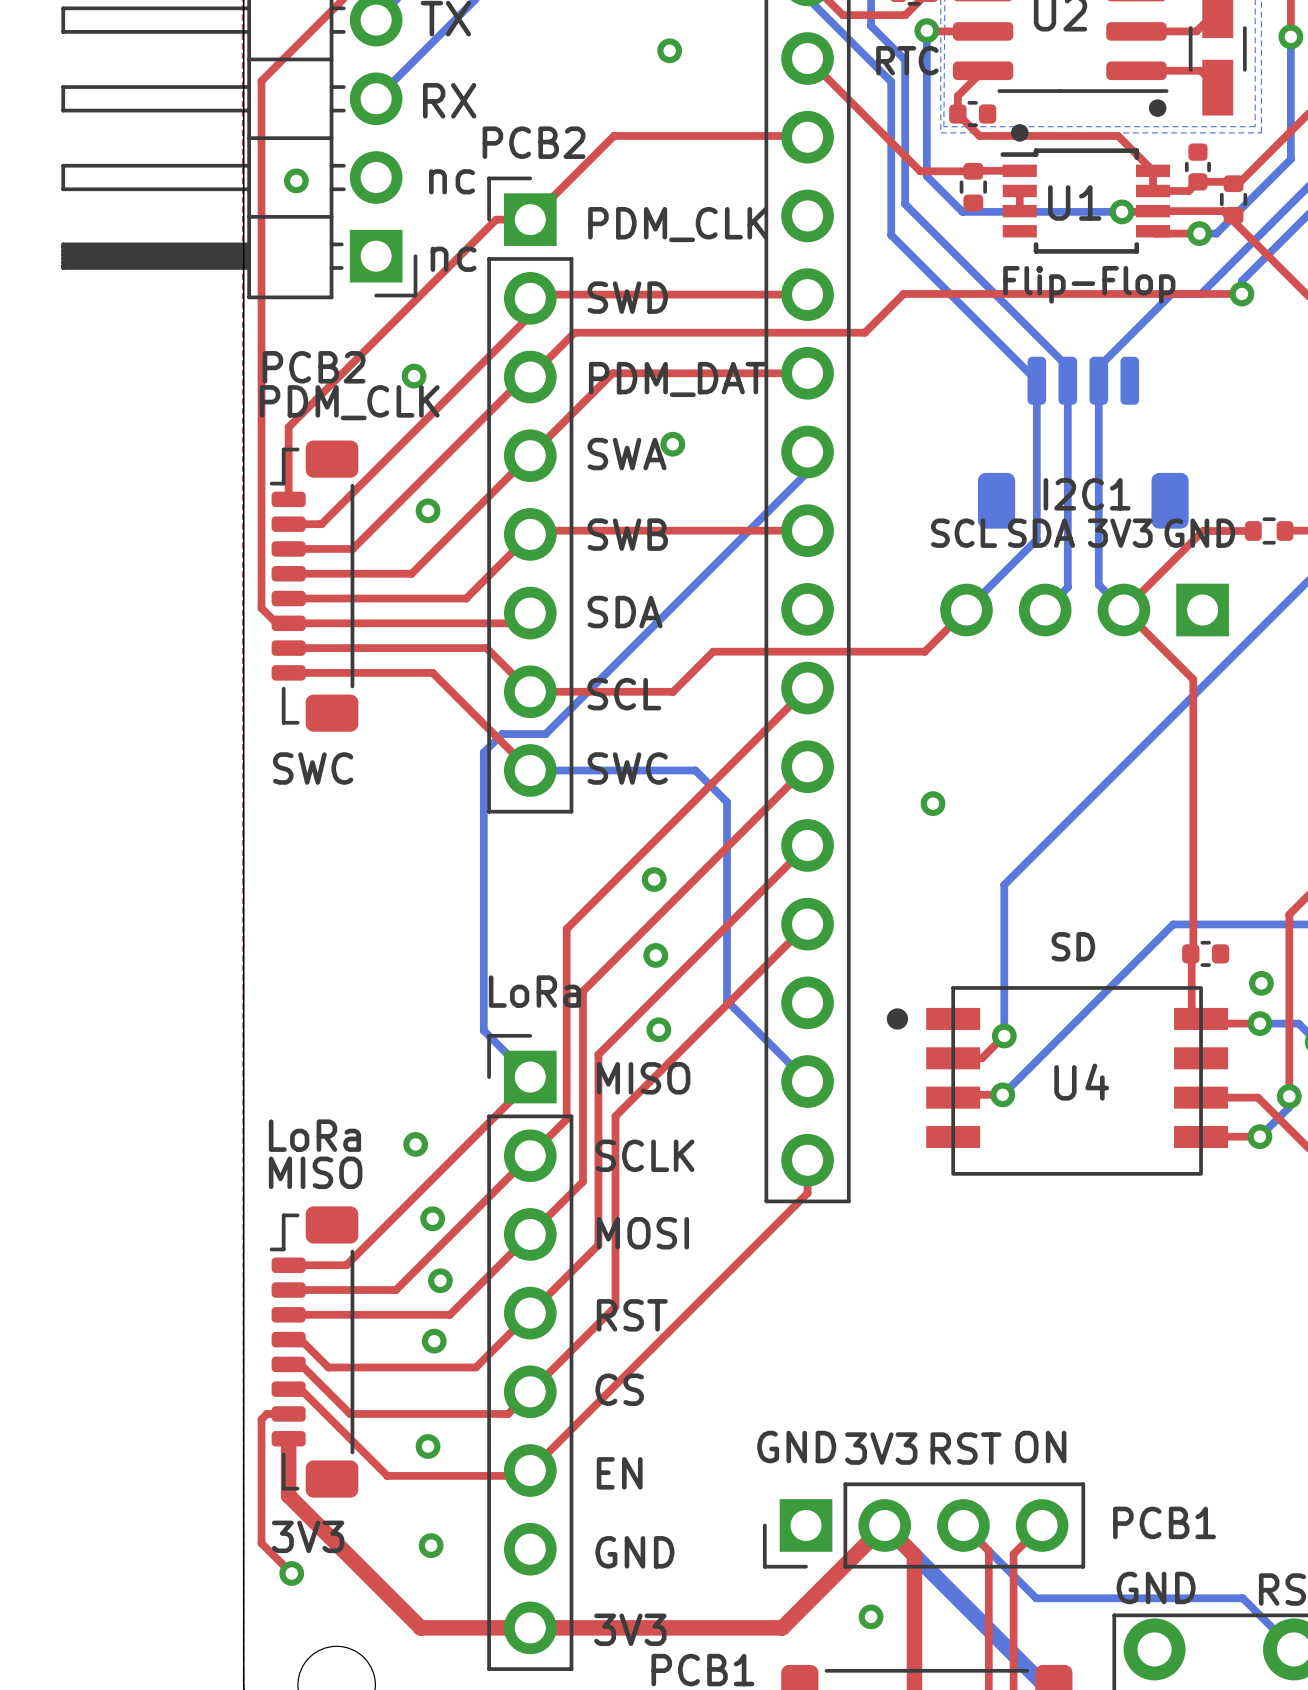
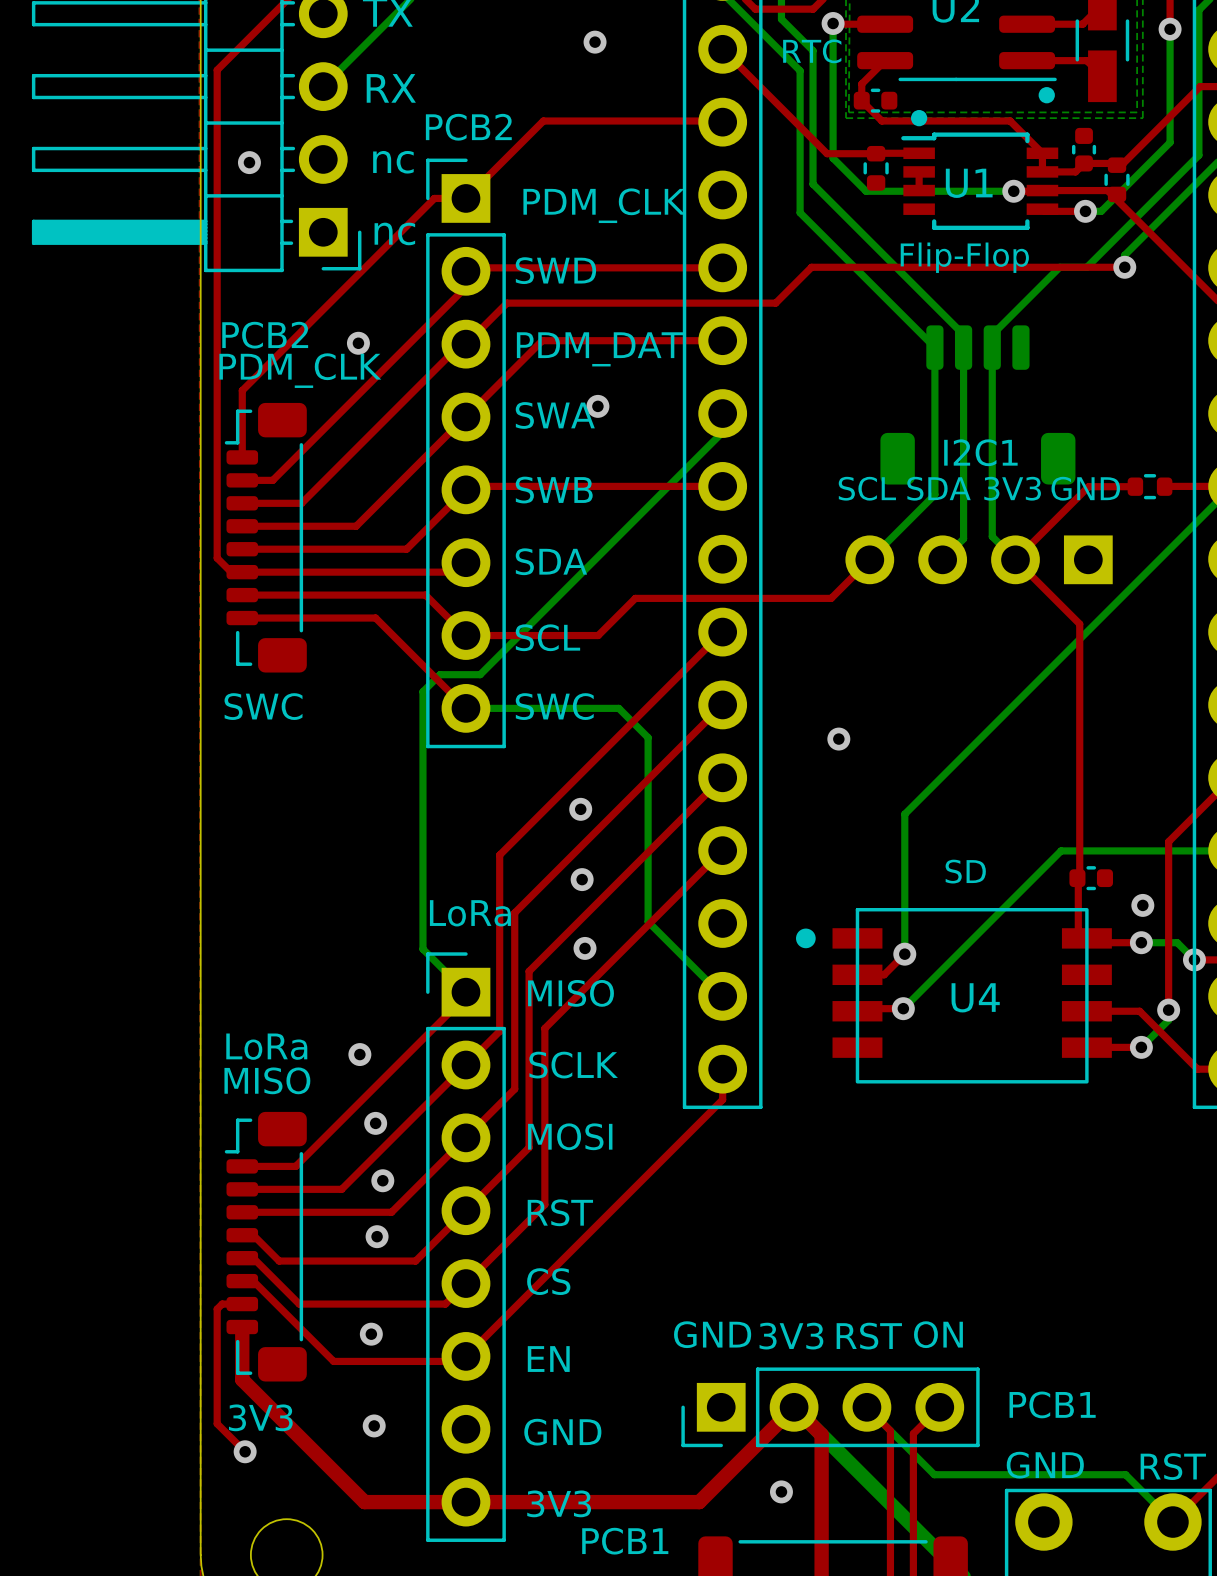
via: (428, 510) -> none

